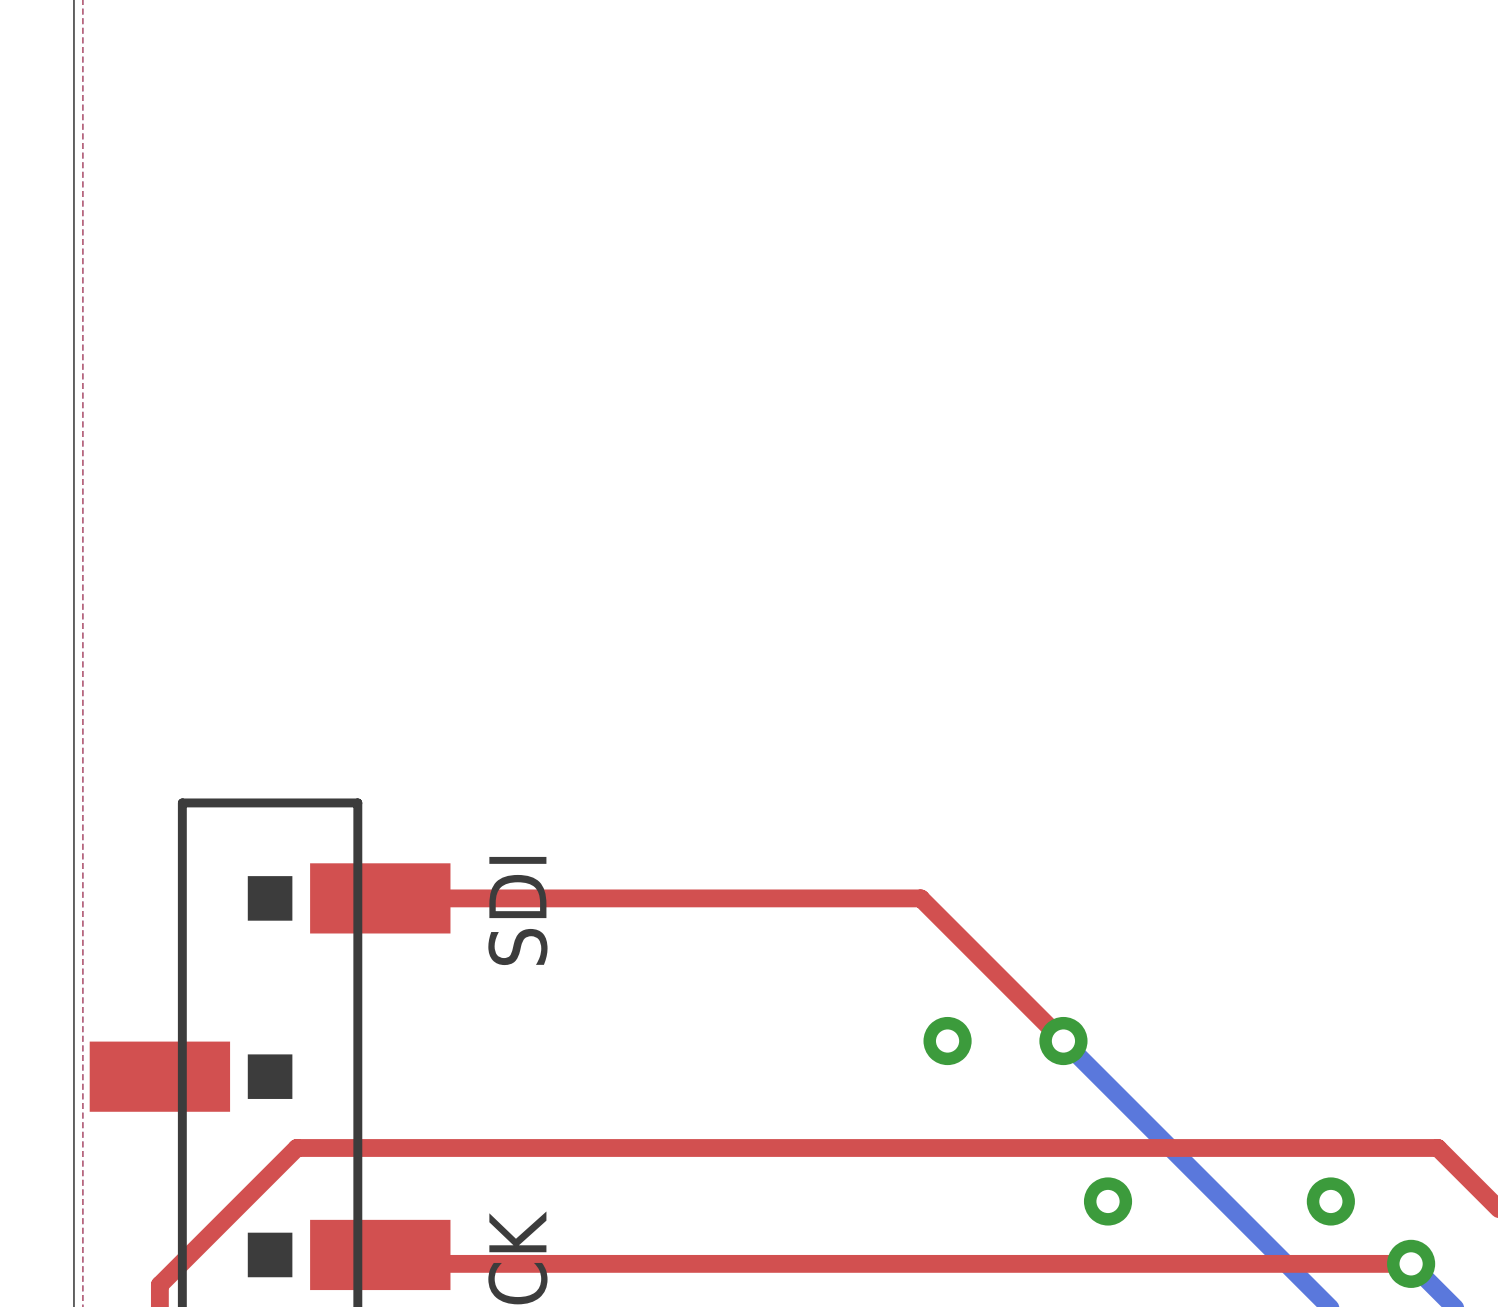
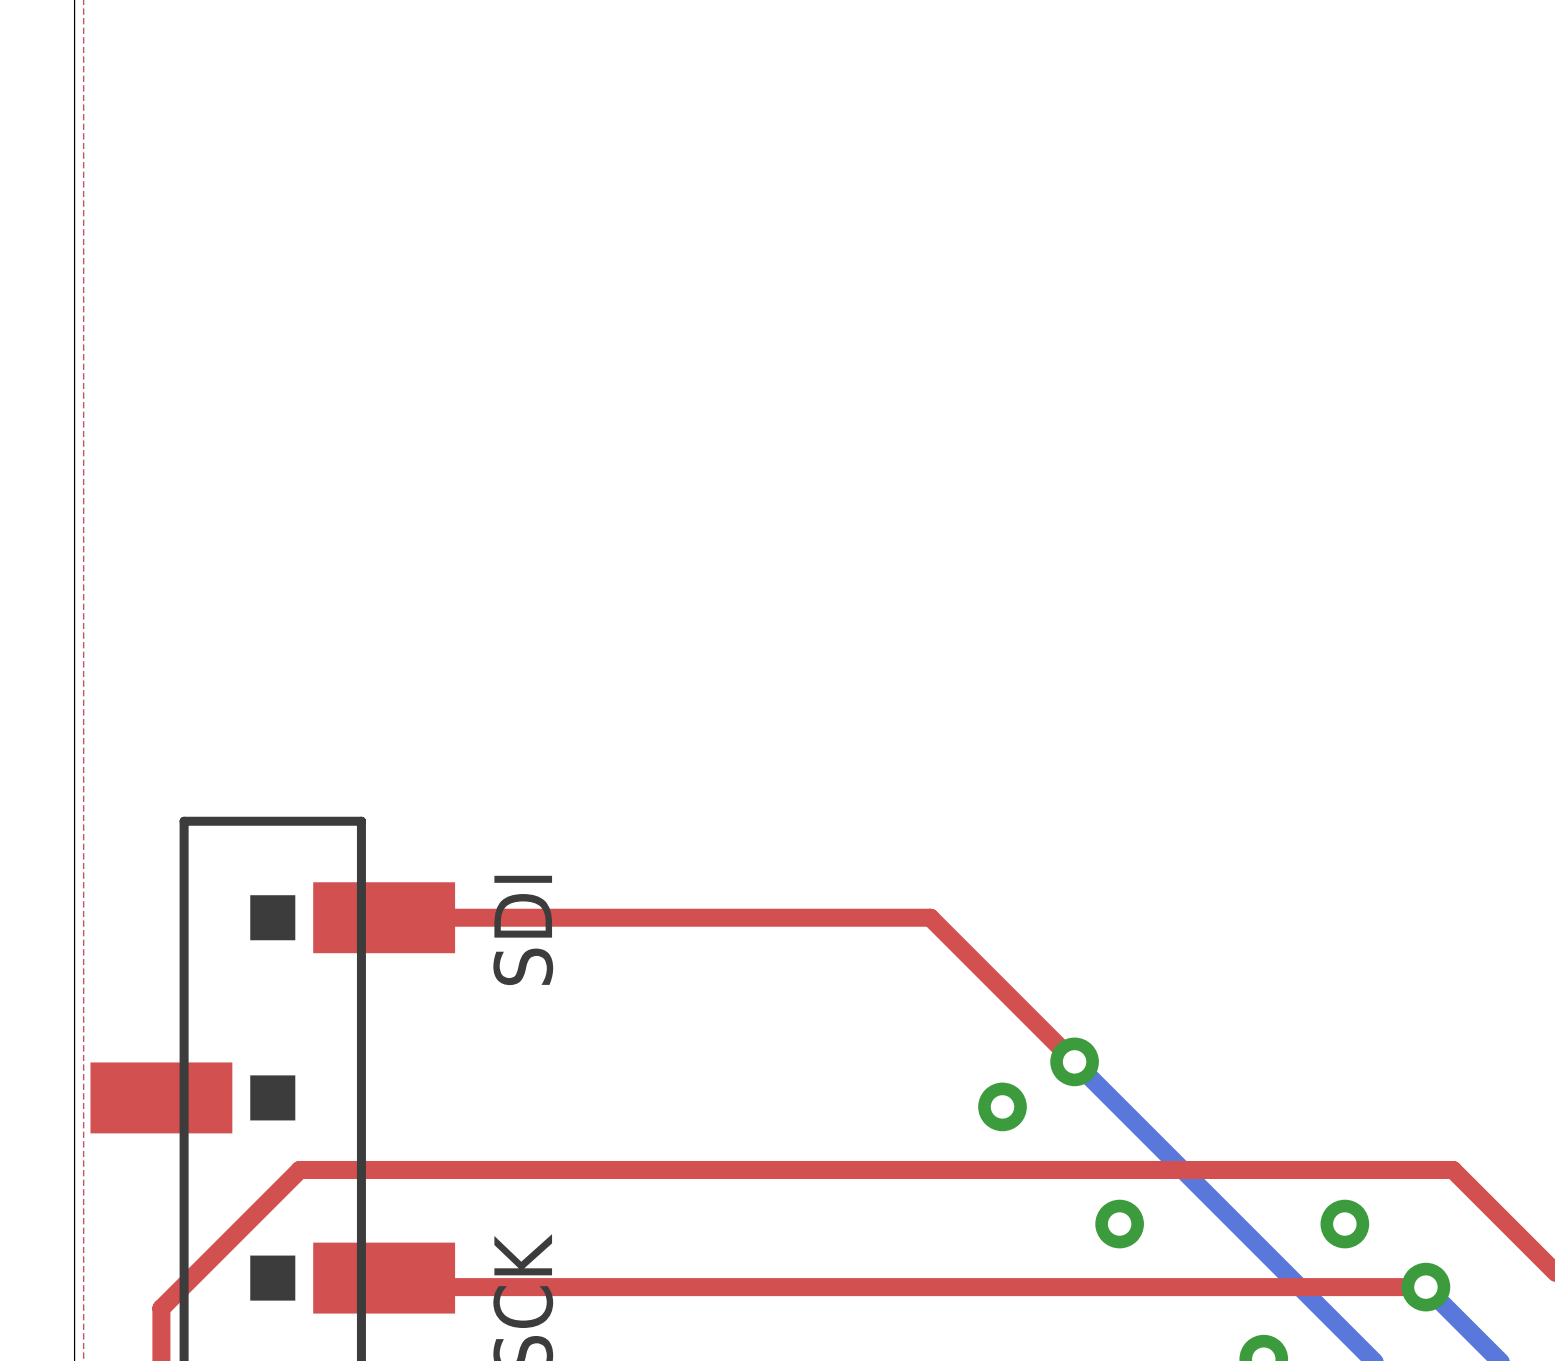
via position: (947, 1041) -> (1002, 1106)

